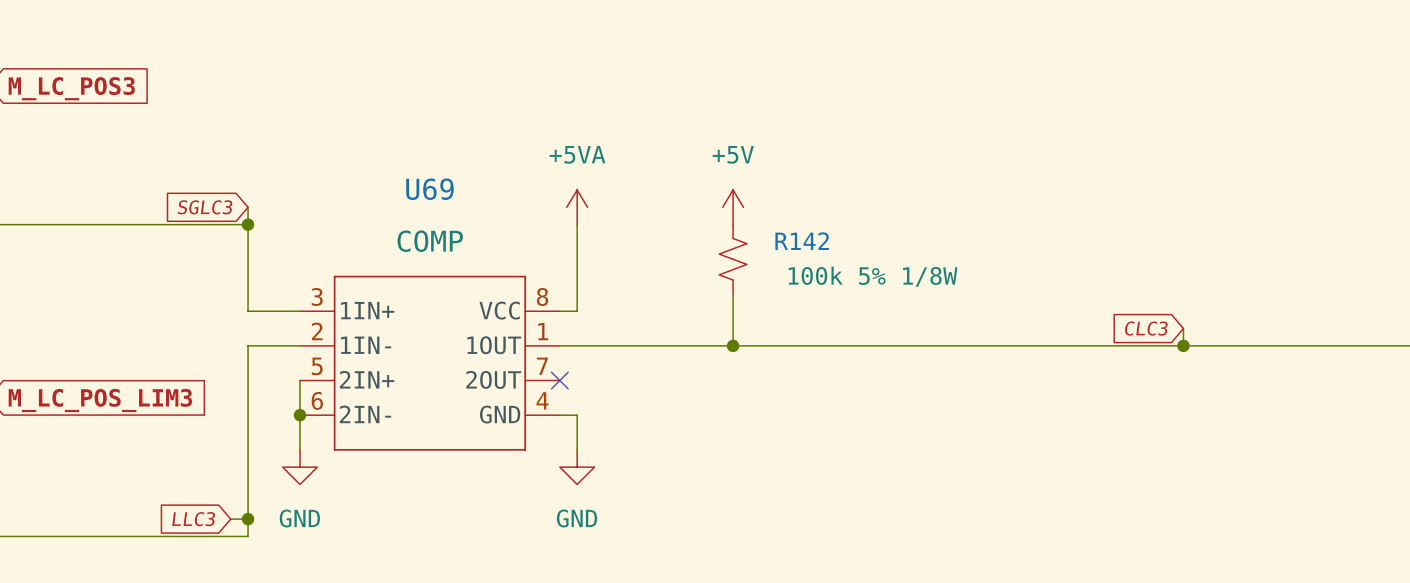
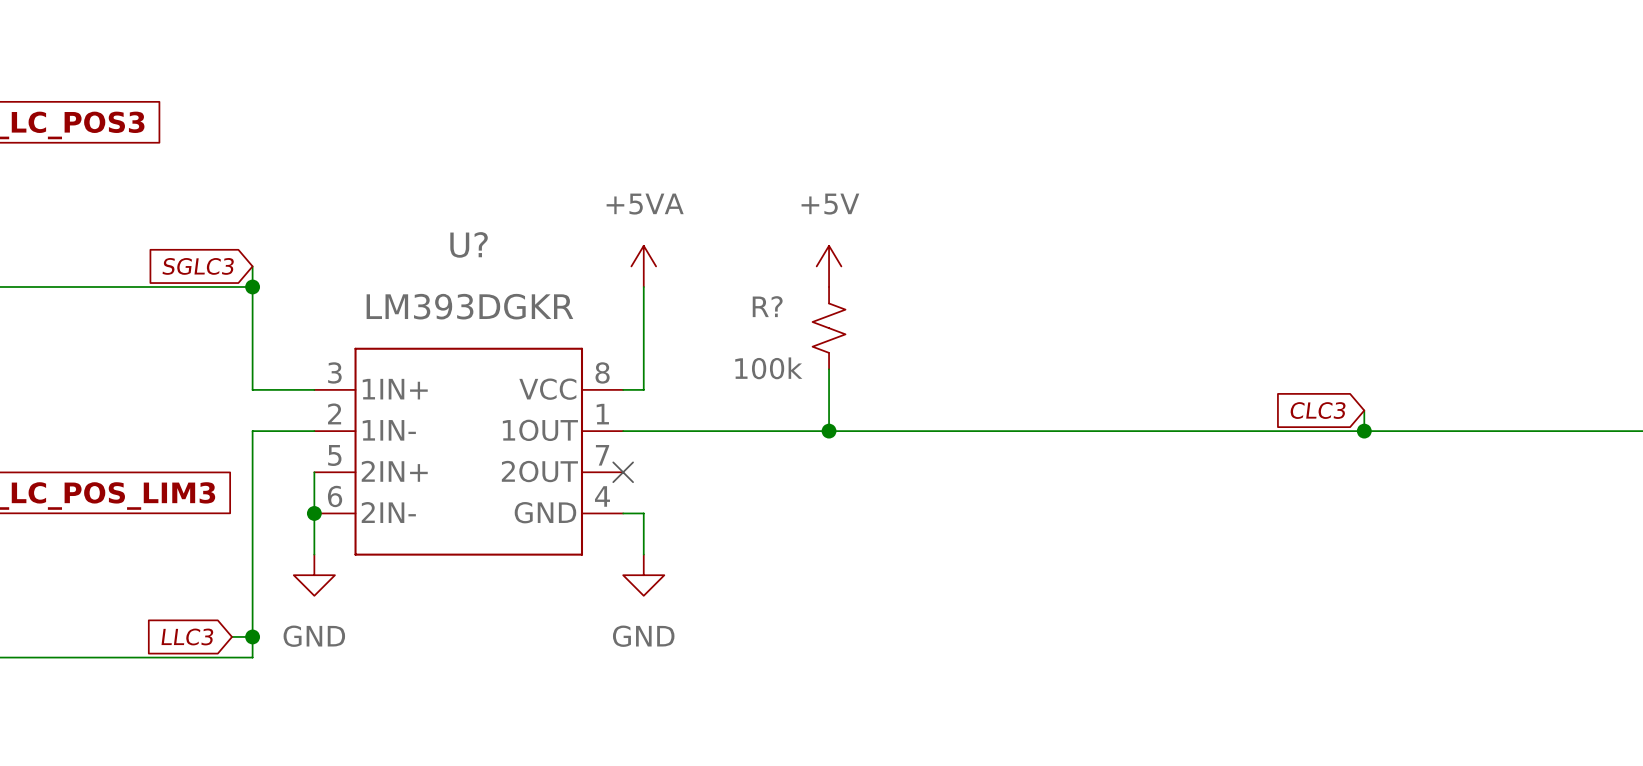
U69 name: U69 (429, 189) -> U? (469, 244)
U69 value: COMP (430, 241) -> LM393DGKR (469, 306)
R142 name: R142 (802, 241) -> R? (767, 306)
R142 value: 100k 5% 1/8W (873, 276) -> 100k (768, 368)

